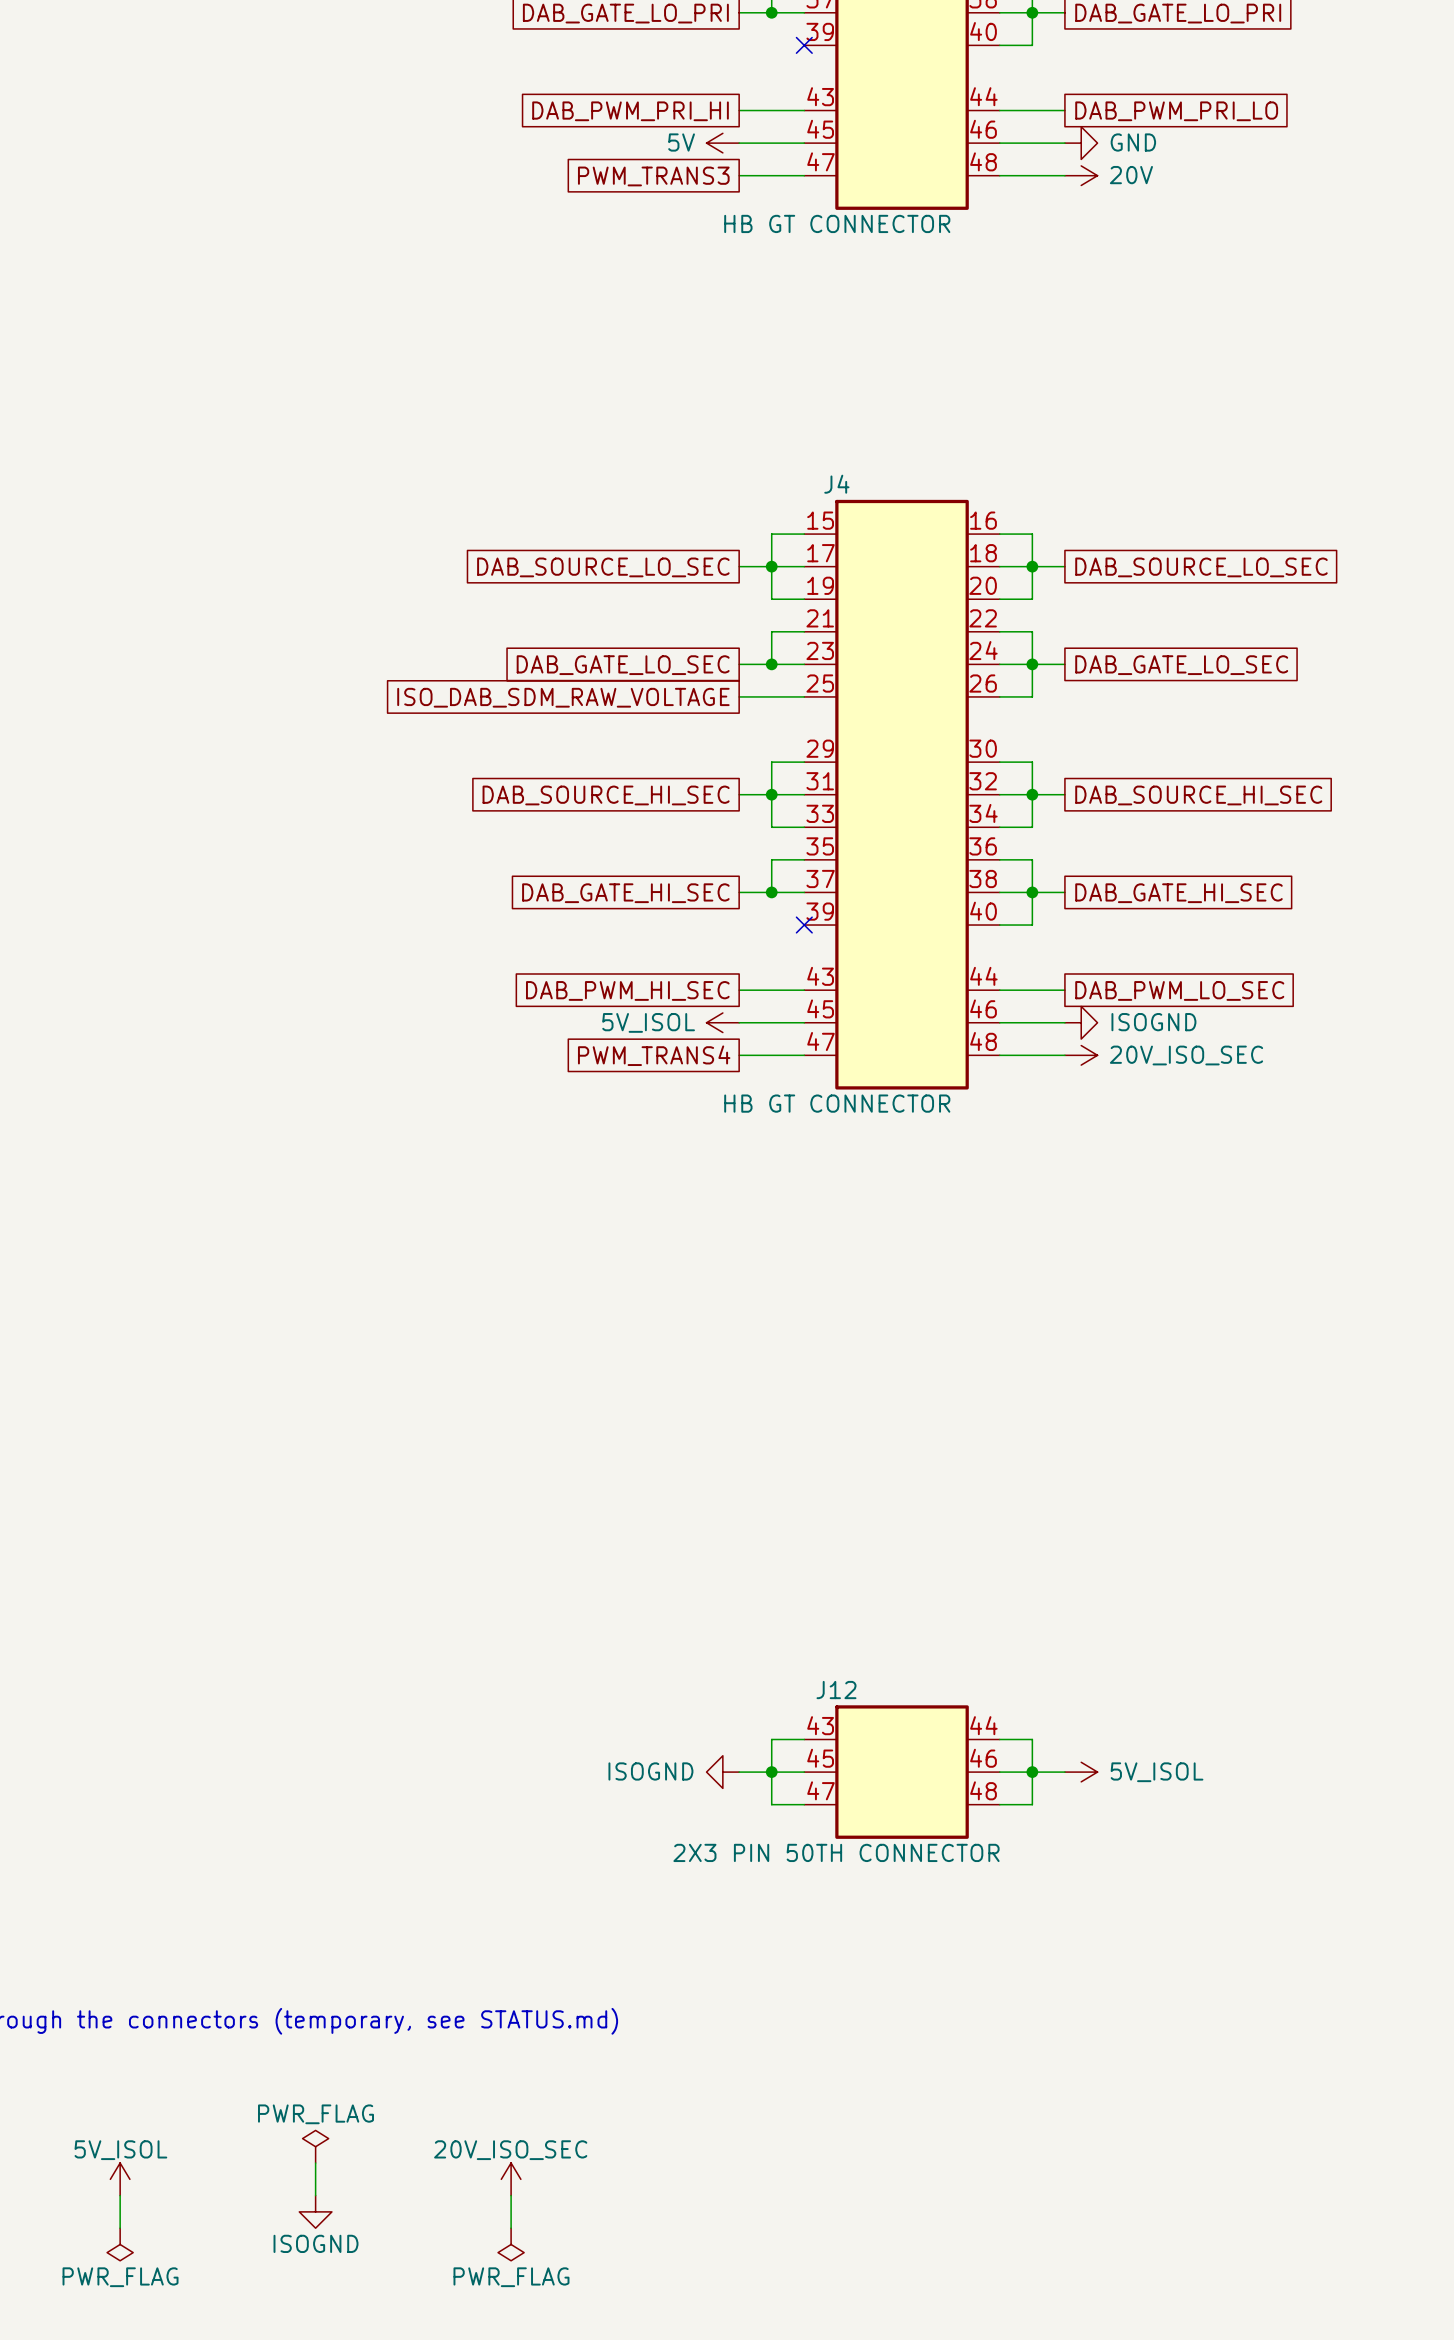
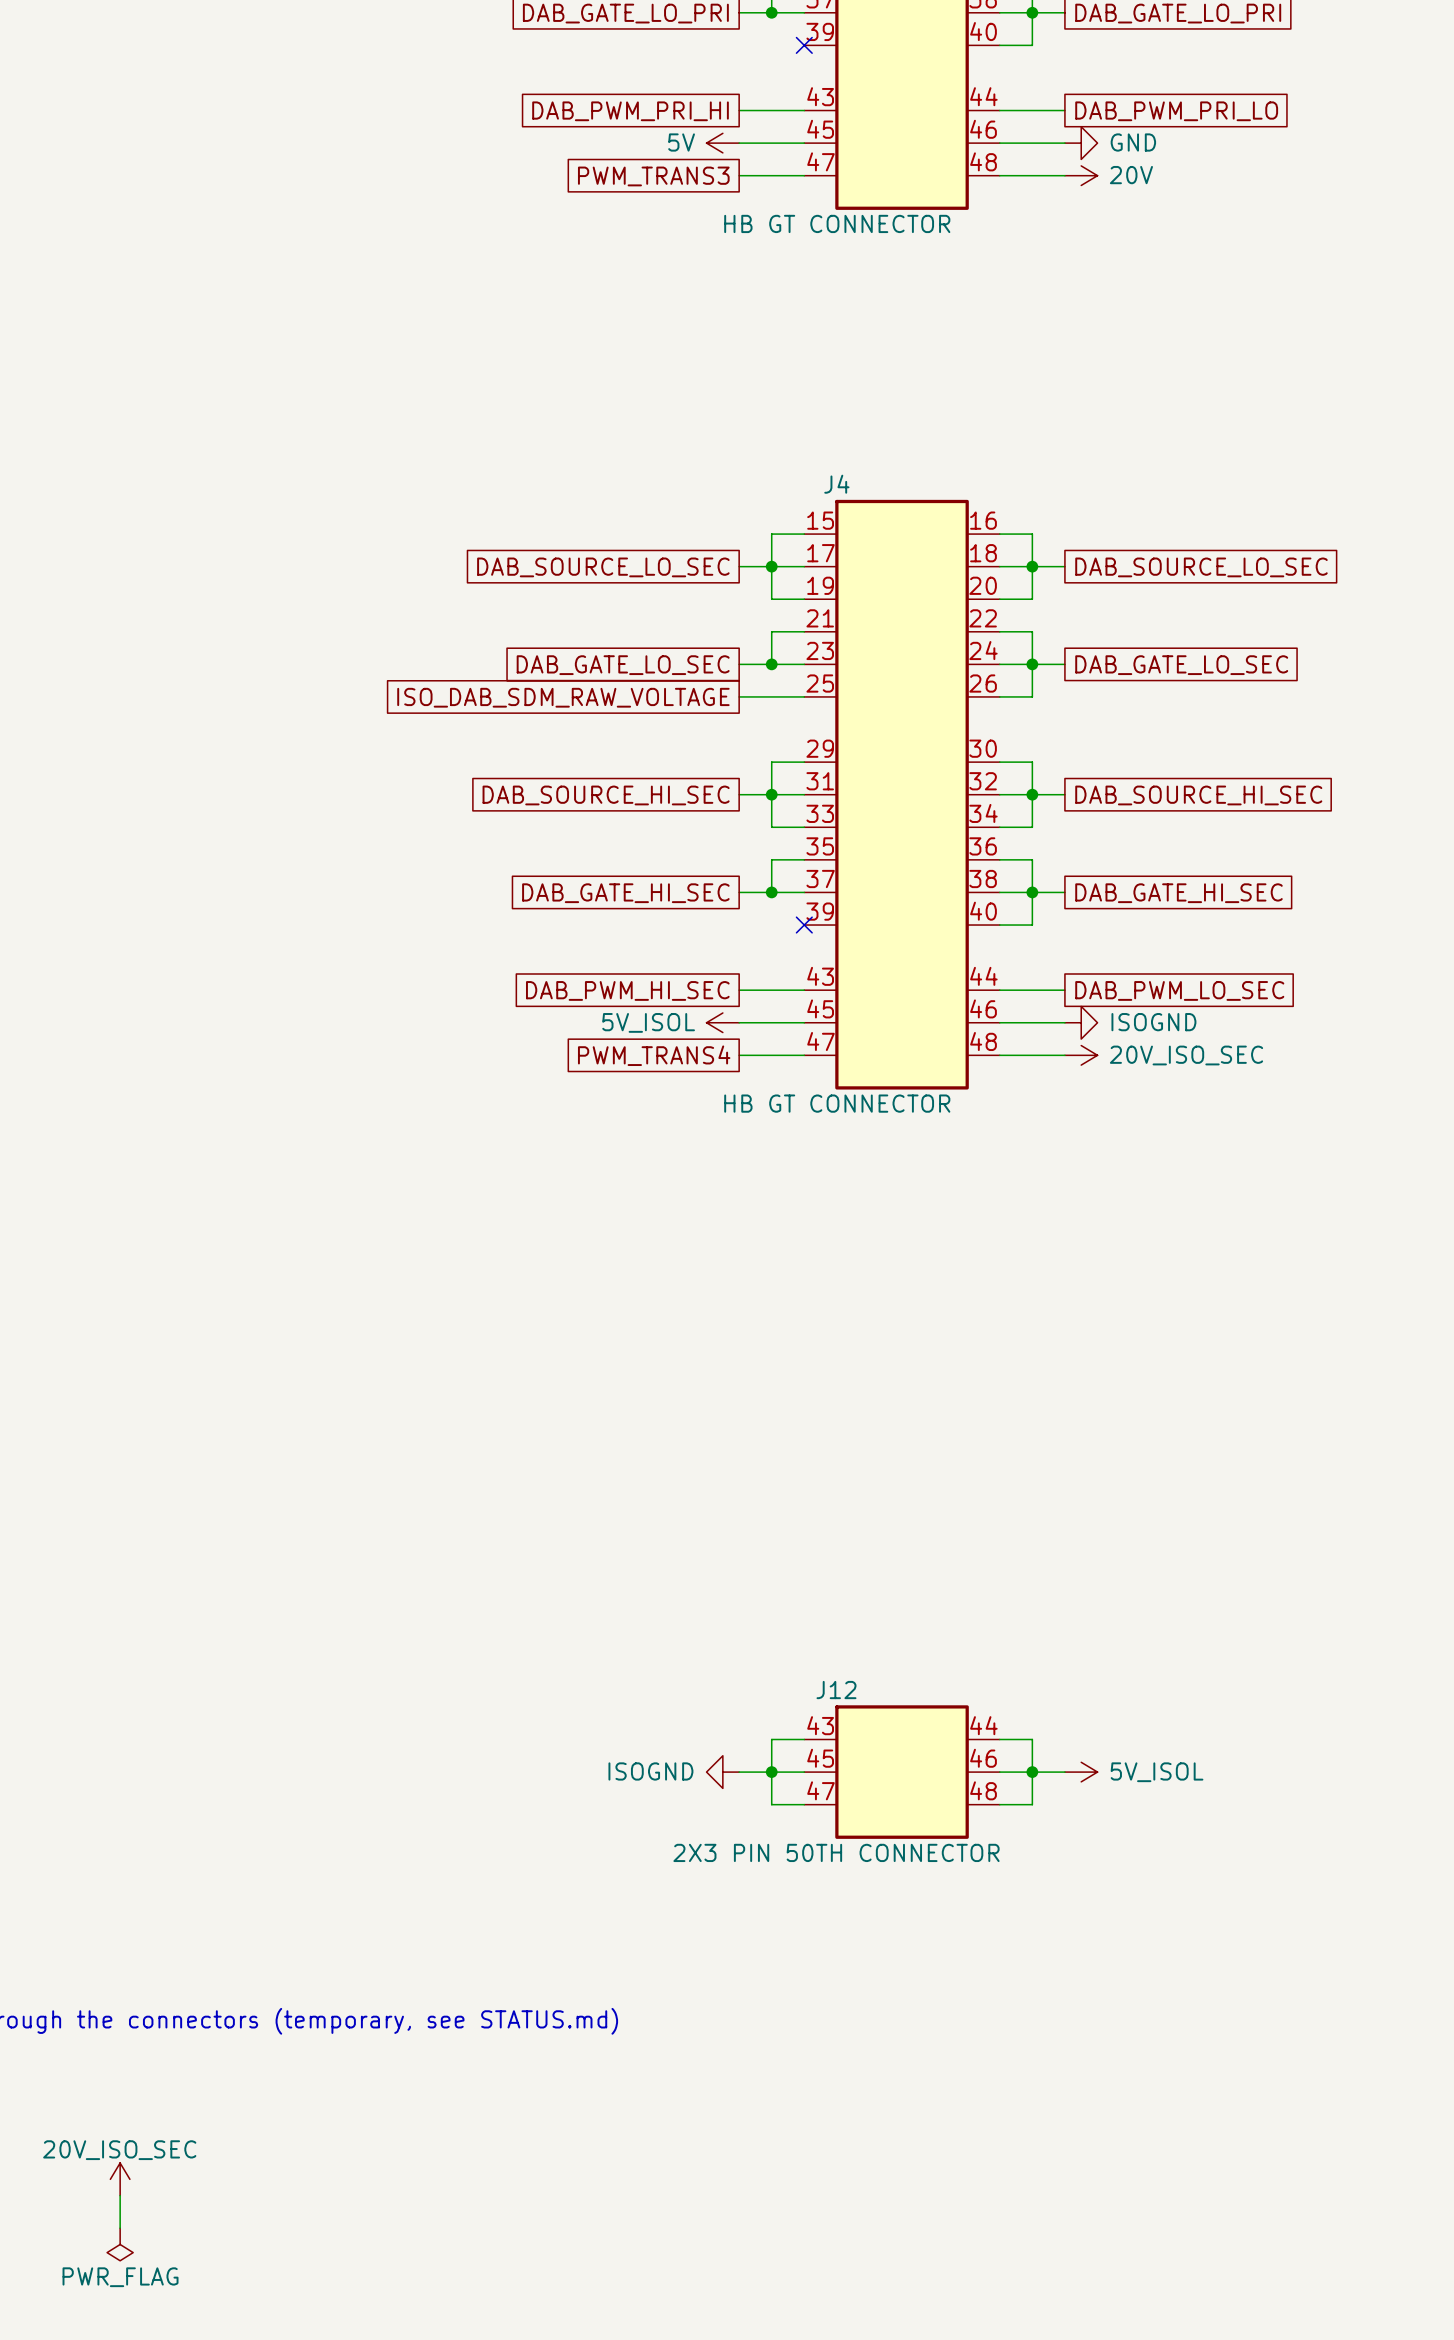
power symbol: PWR_FLAG (315, 2146) -> none
wire: (315, 2163) (315, 2195) -> none
power symbol: 5V_ISOL (120, 2179) -> 20V_ISO_SEC (120, 2179)
power symbol: 20V_ISO_SEC (511, 2179) -> none
wire: (511, 2195) (511, 2228) -> none
power symbol: ISOGND (315, 2211) -> none
power symbol: PWR_FLAG (511, 2244) -> none

